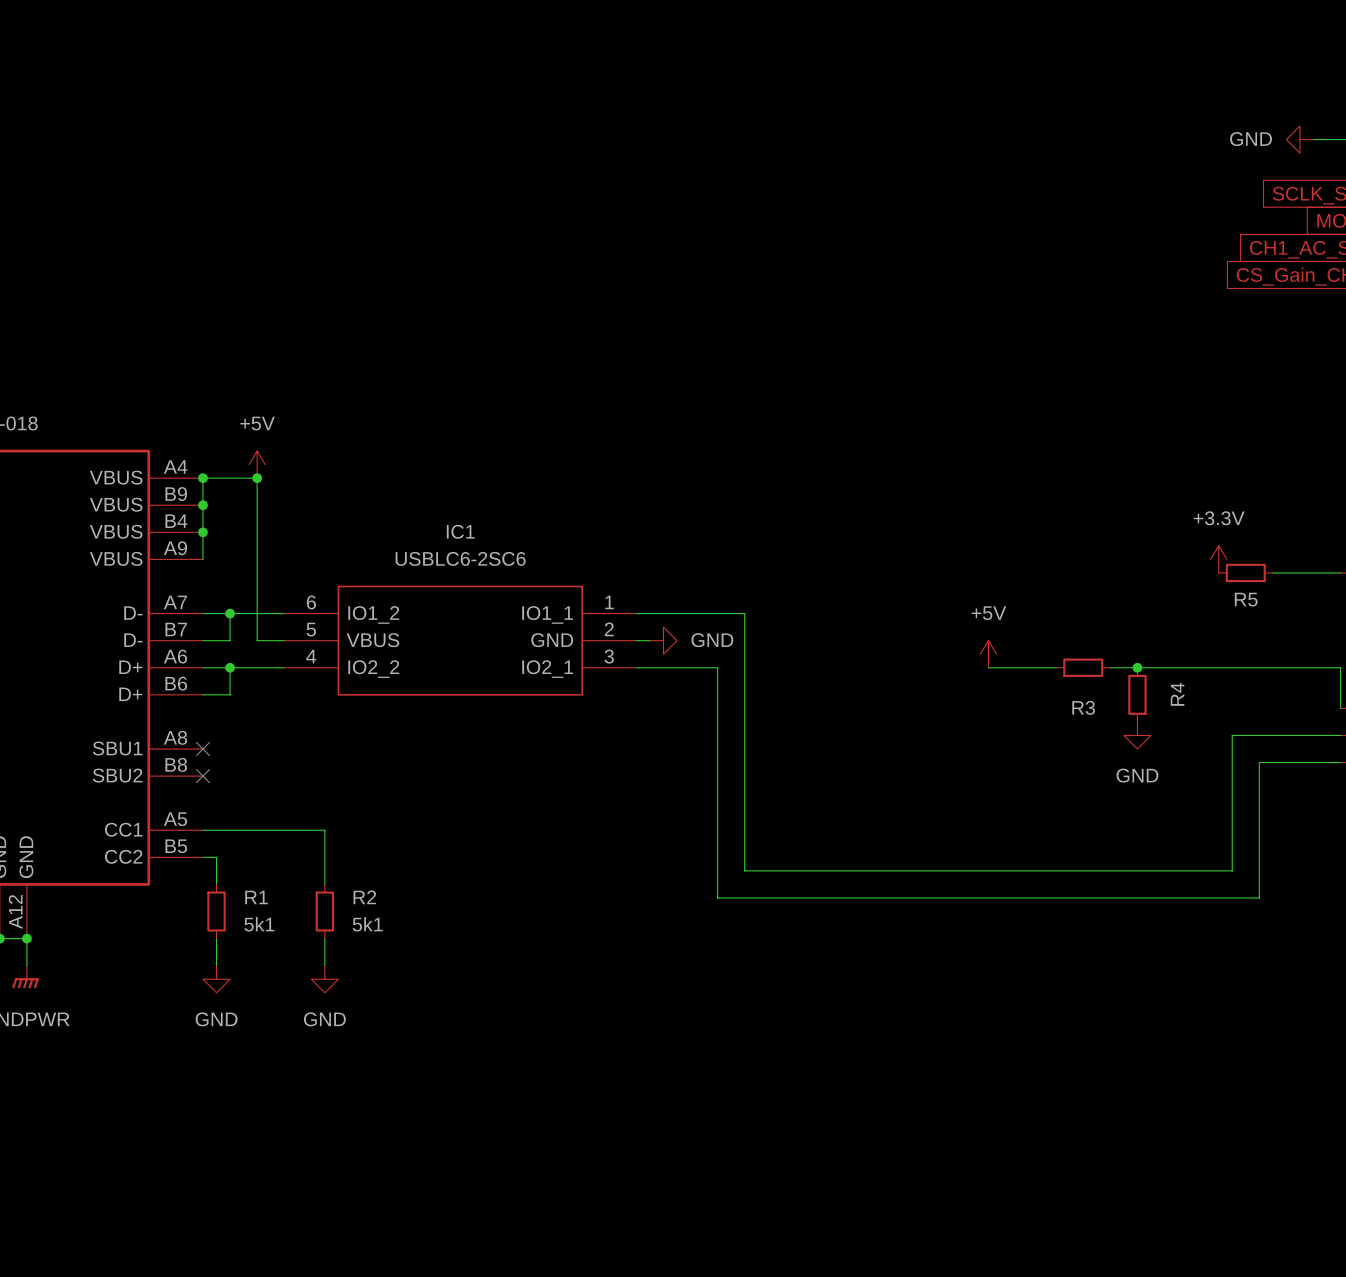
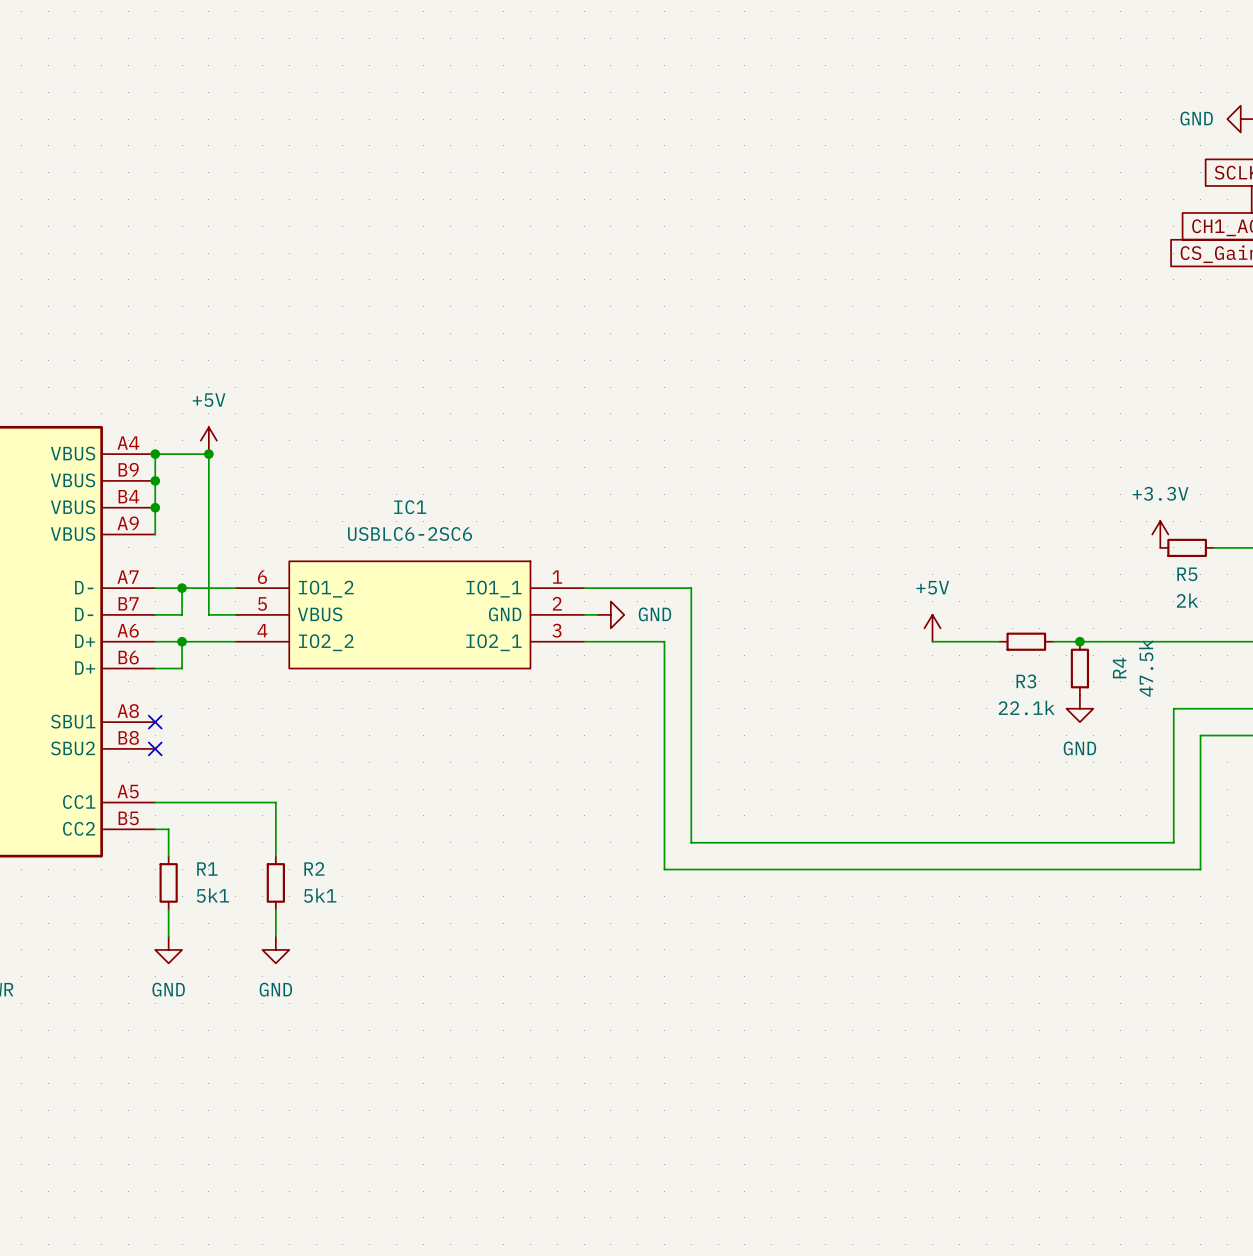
R5 value: none -> 2k (1187, 600)
R4 value: none -> 47.5k (1146, 668)
R3 value: none -> 22.1k (1026, 707)

